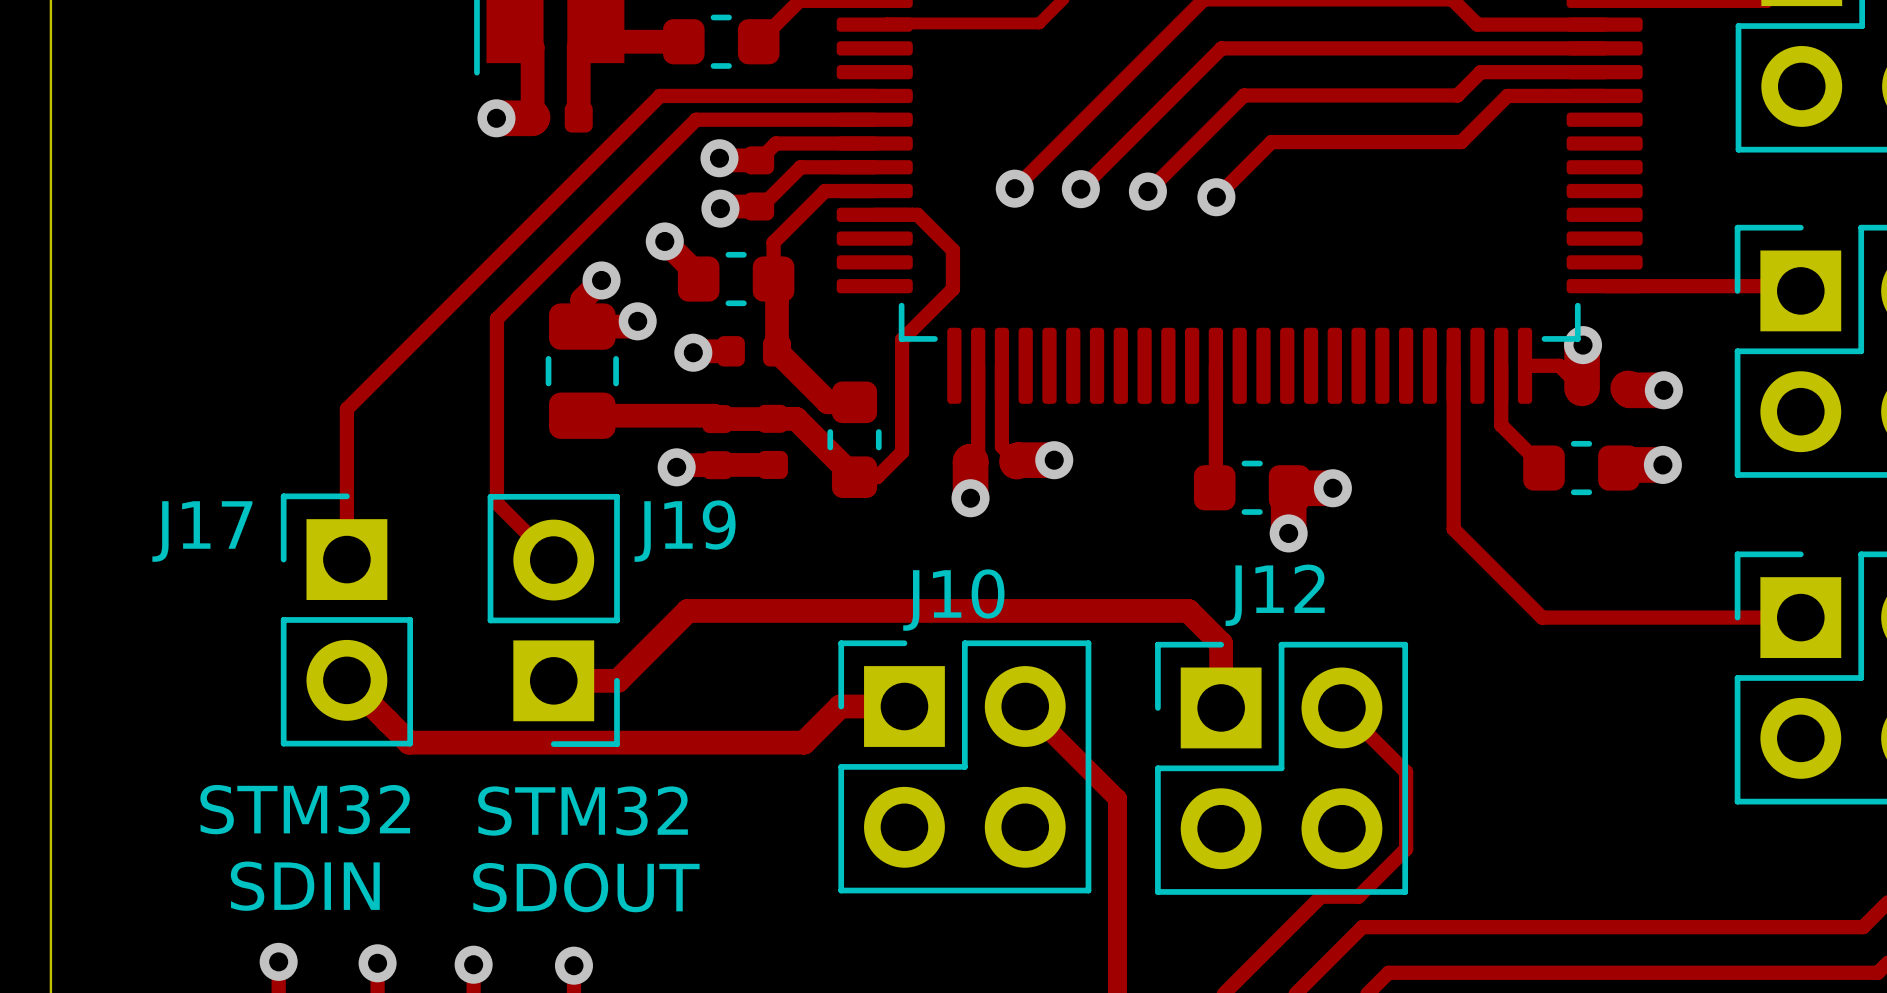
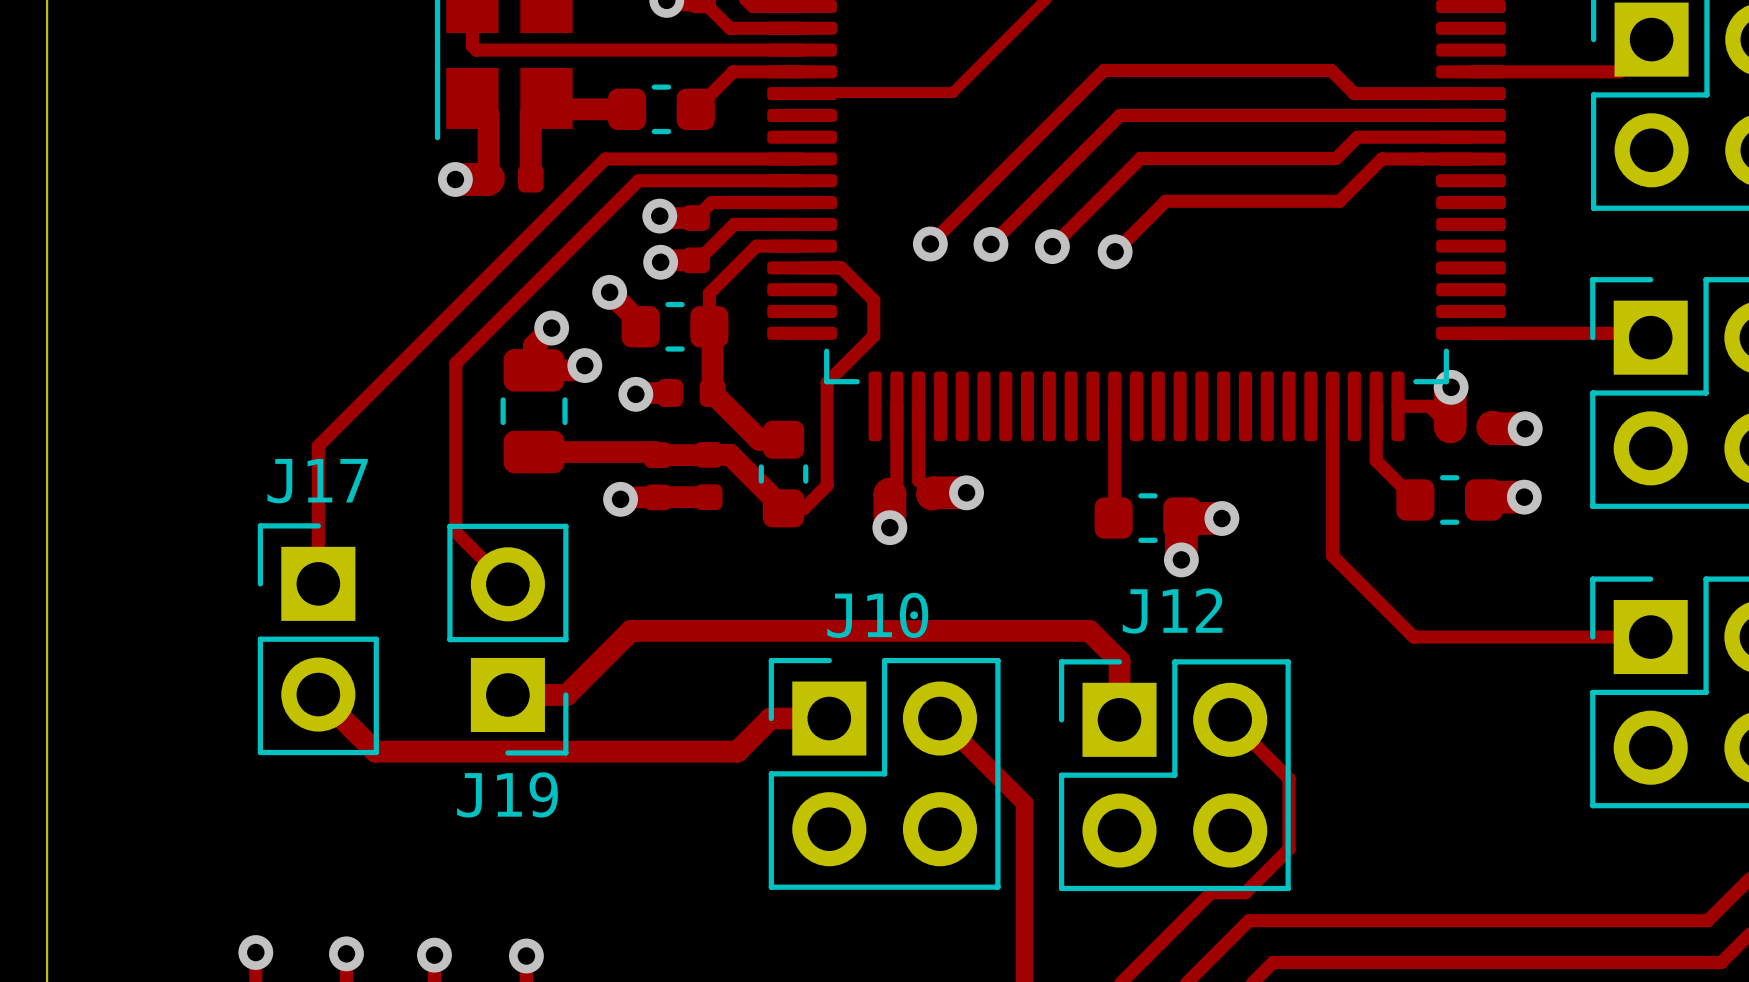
J17 name position: J17 (202, 531) -> J17 (317, 481)
J19 name position: J19 (685, 531) -> J19 (507, 794)
text: STM32 (305, 809) -> none
text: STM32 (583, 811) -> none
text: SDIN (305, 886) -> none
text: SDOUT (586, 887) -> none

